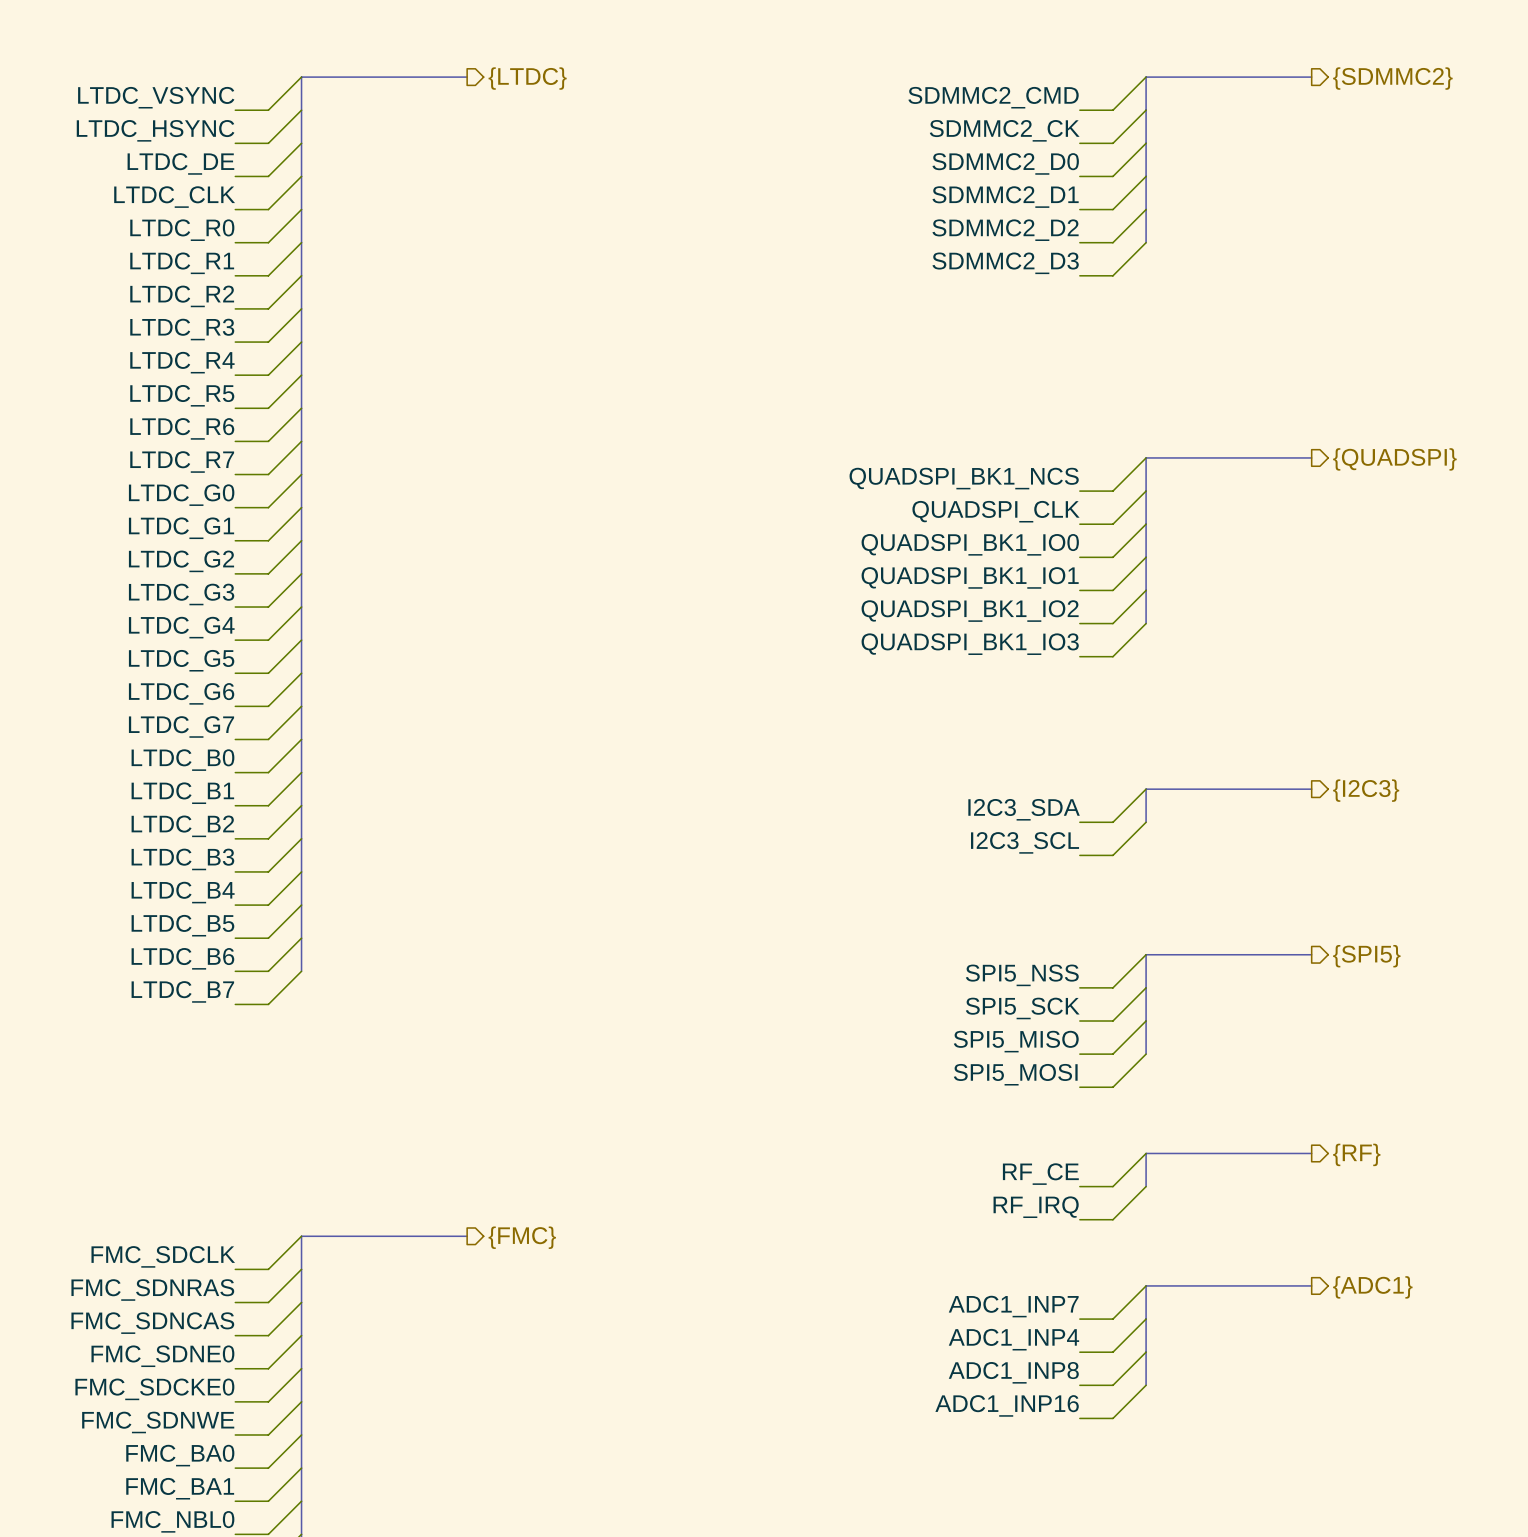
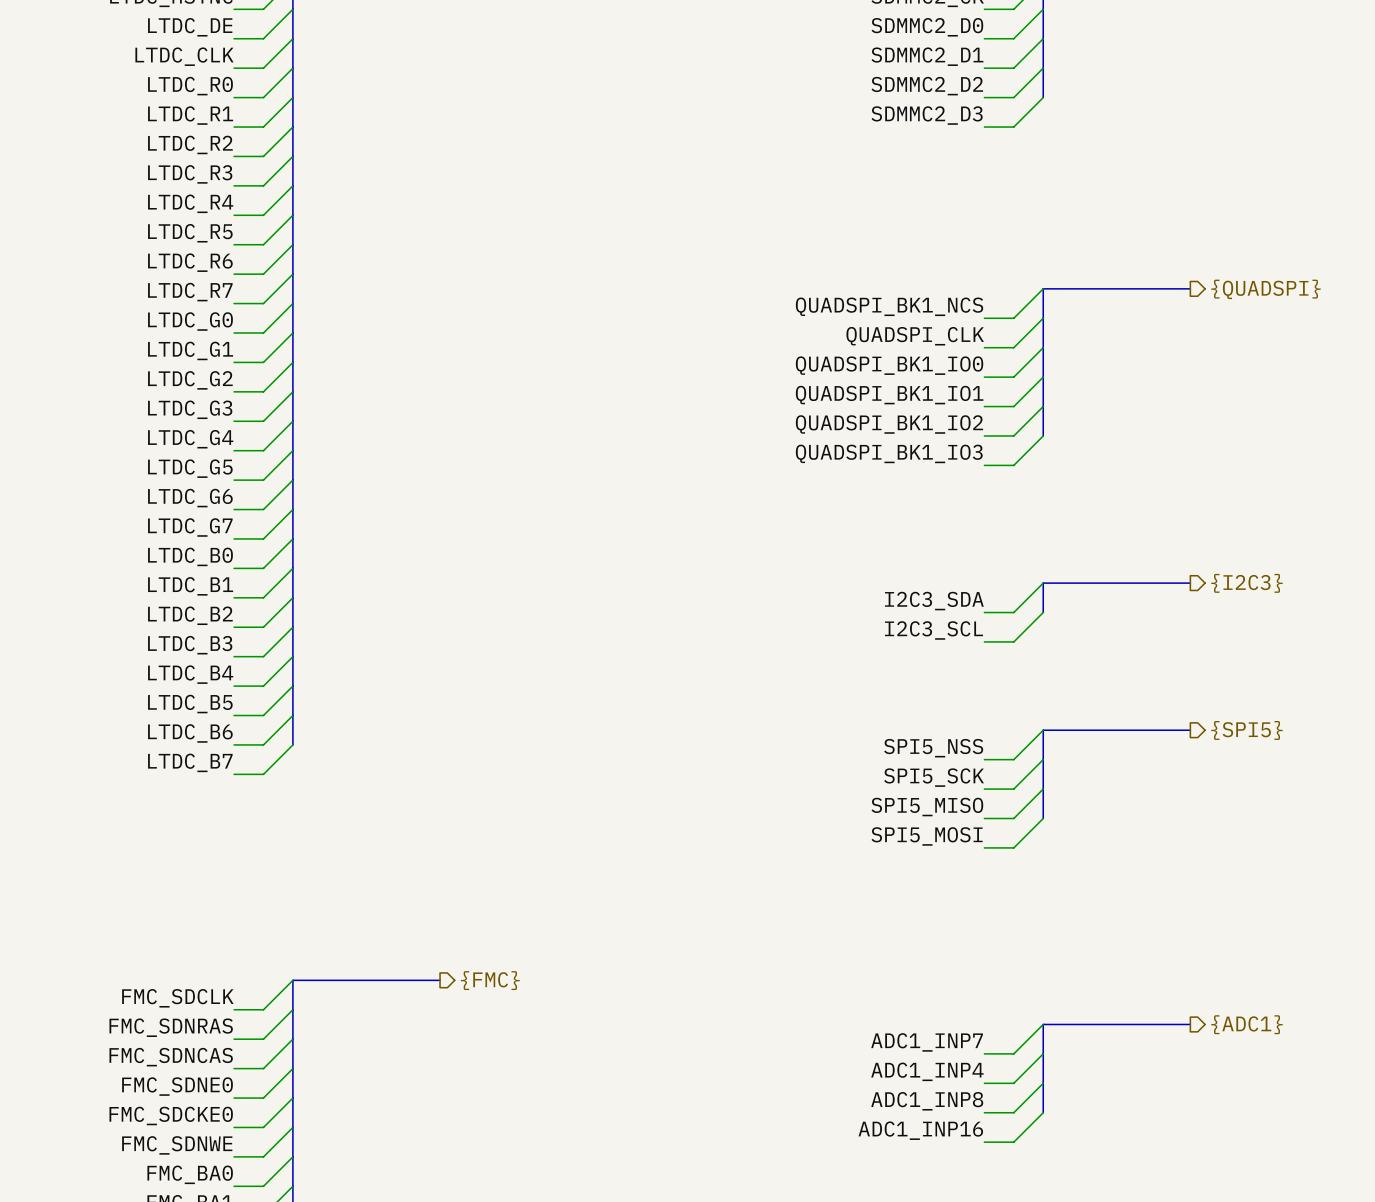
wire: (1146, 1153) (1112, 1186) (1079, 1186) -> none
bus: (1311, 1153) (1146, 1153) (1146, 1186) -> none
hierarchical label: {RF} (1356, 1154) -> none
label: RF_CE (1040, 1174) -> none
wire: (1146, 1186) (1112, 1219) (1079, 1219) -> none
label: RF_IRQ (1036, 1207) -> none

